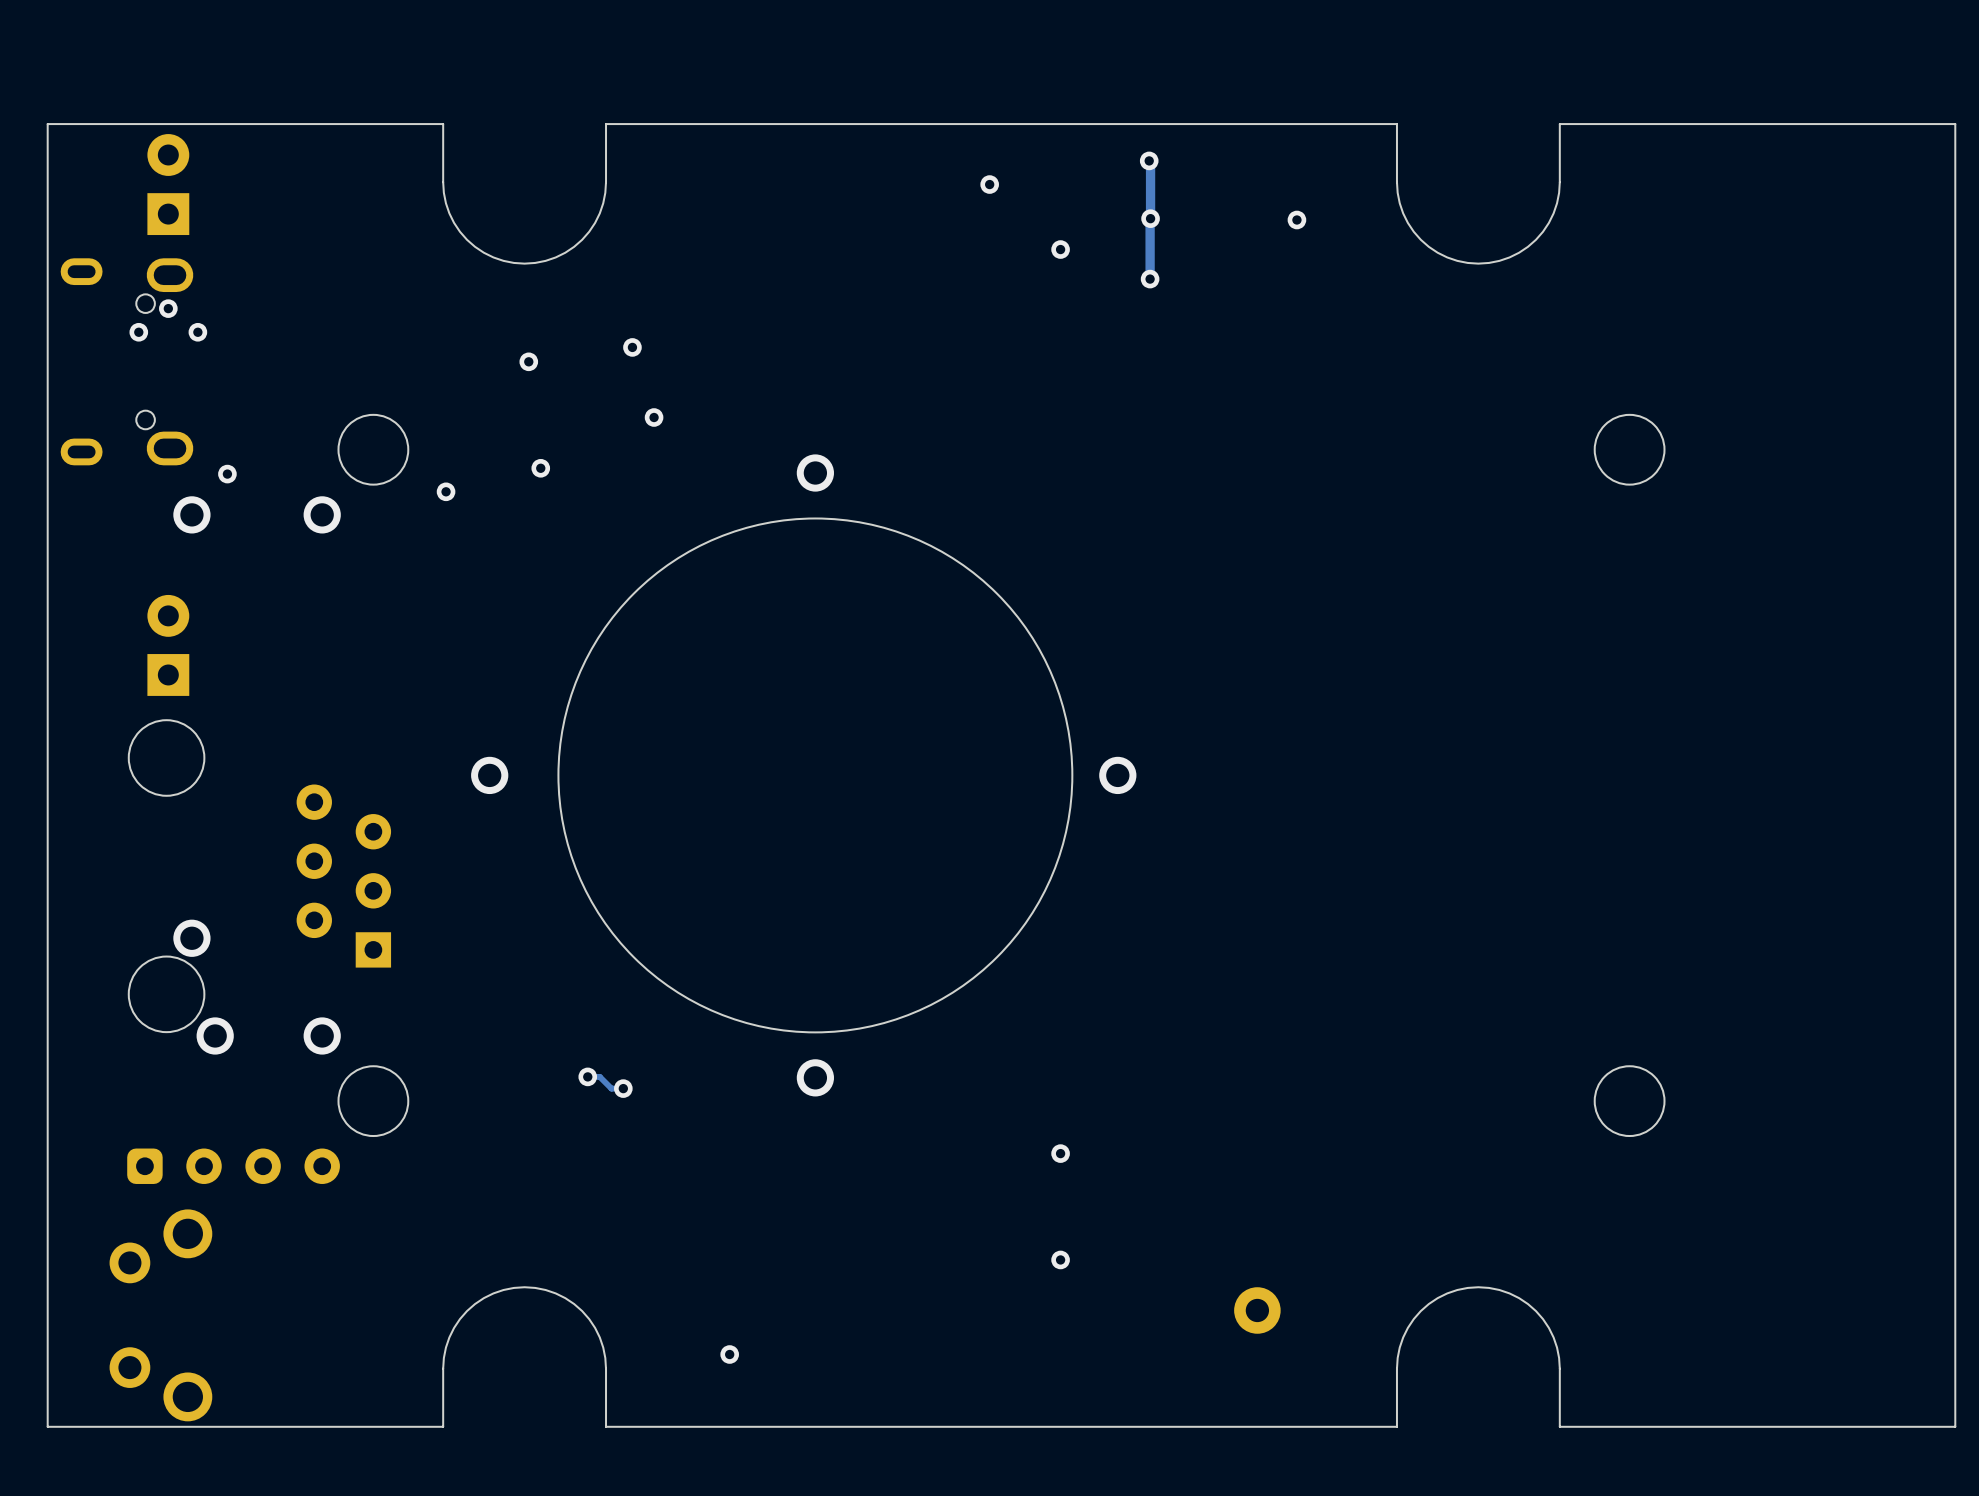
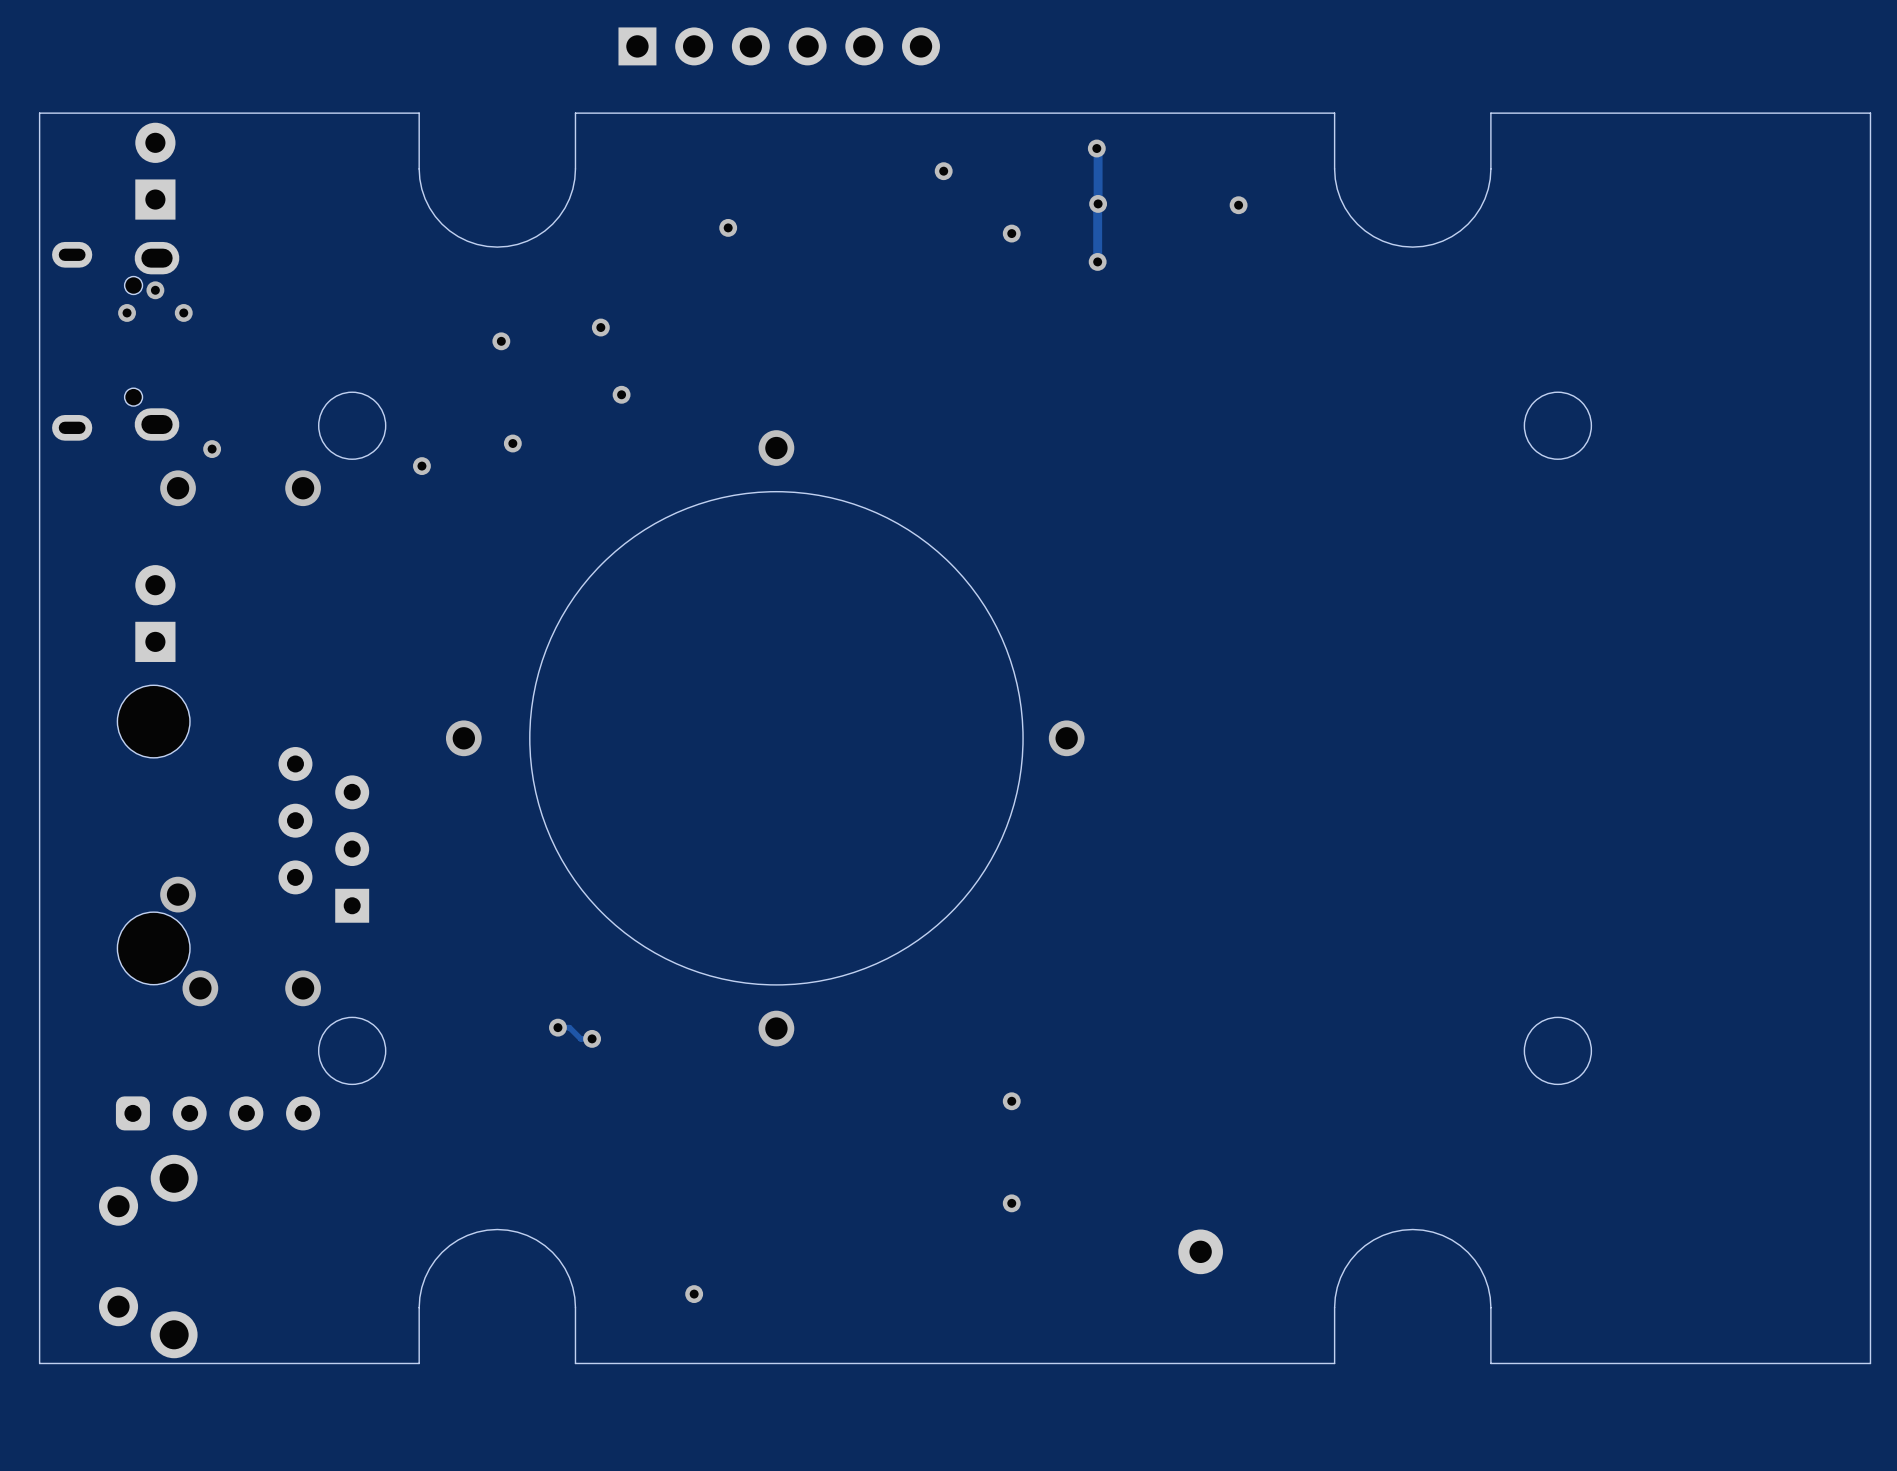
part: none -> (779, 46)
via: none -> (728, 227)

